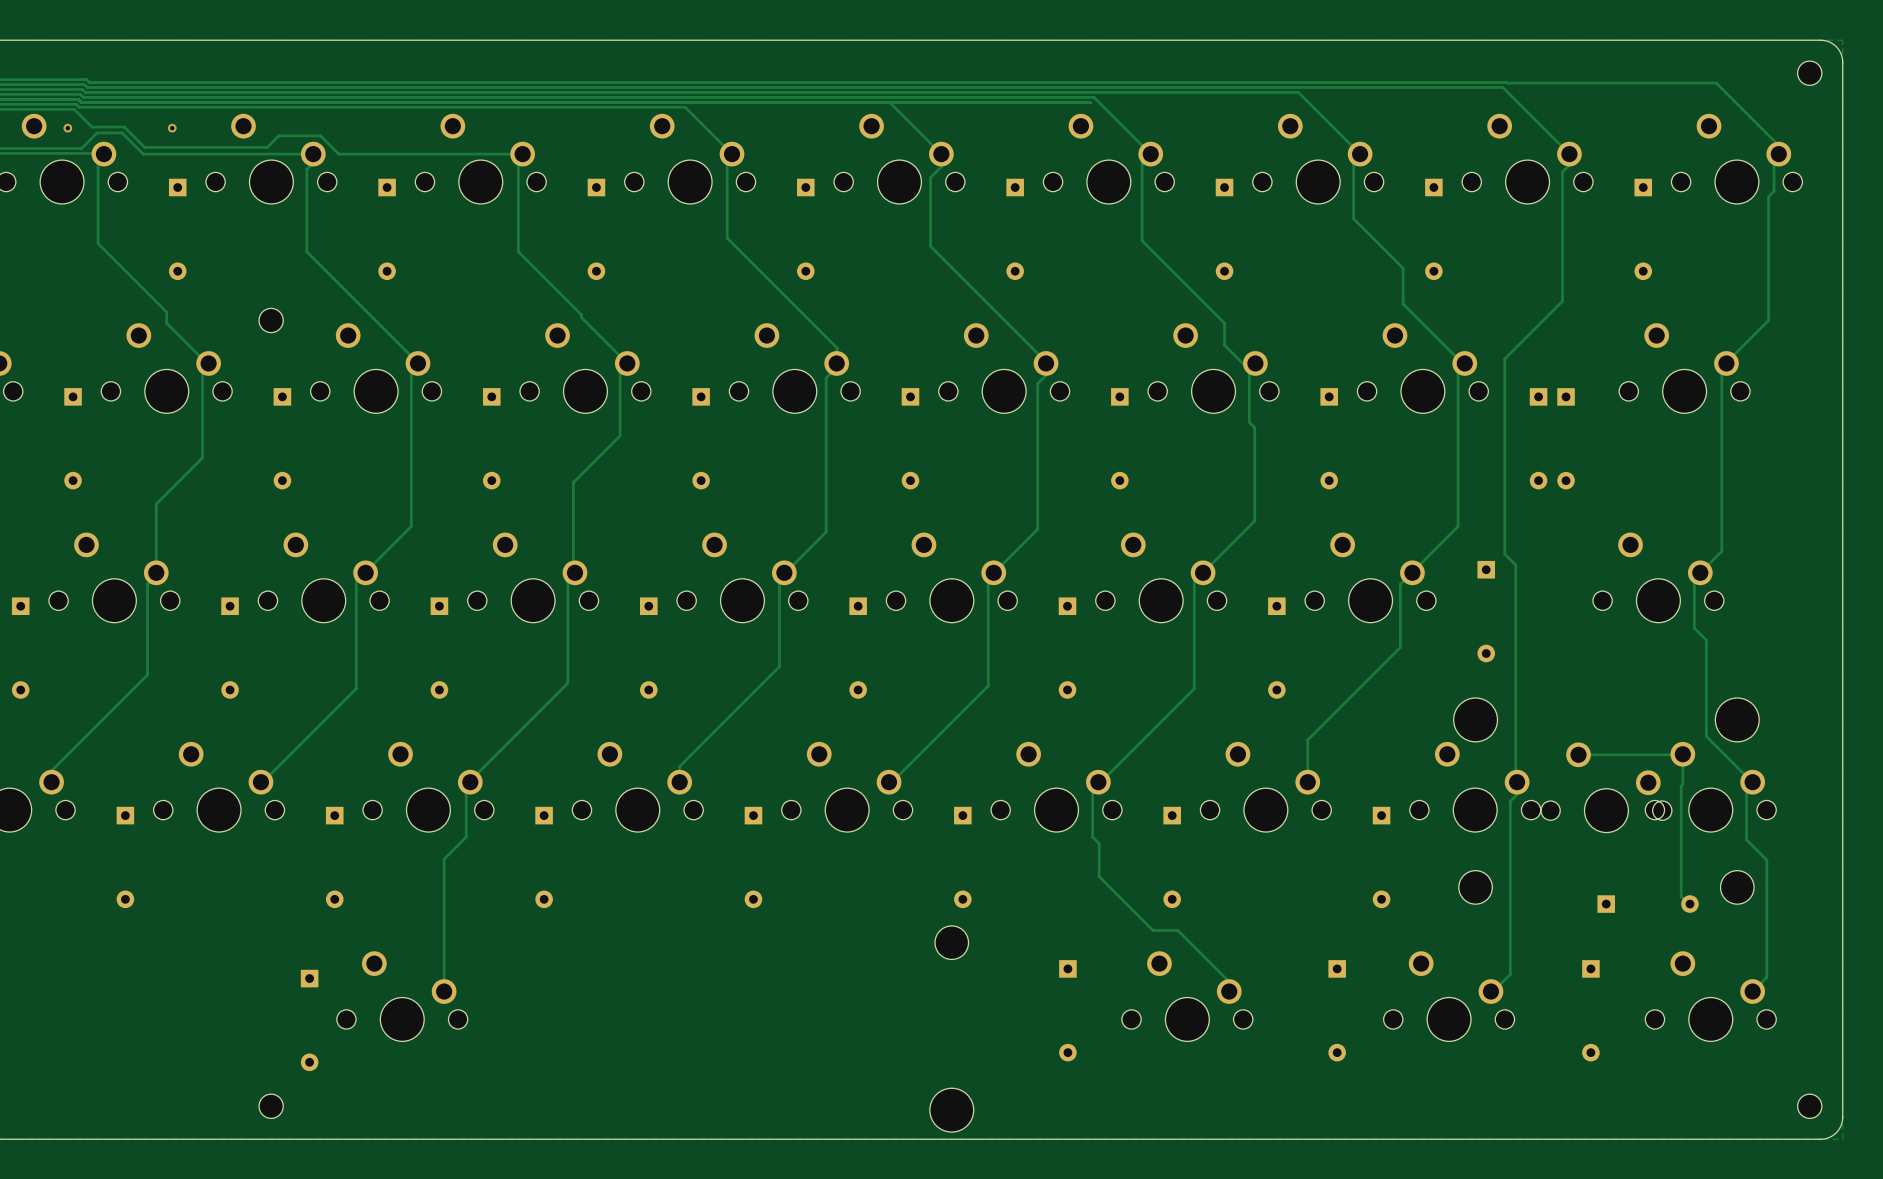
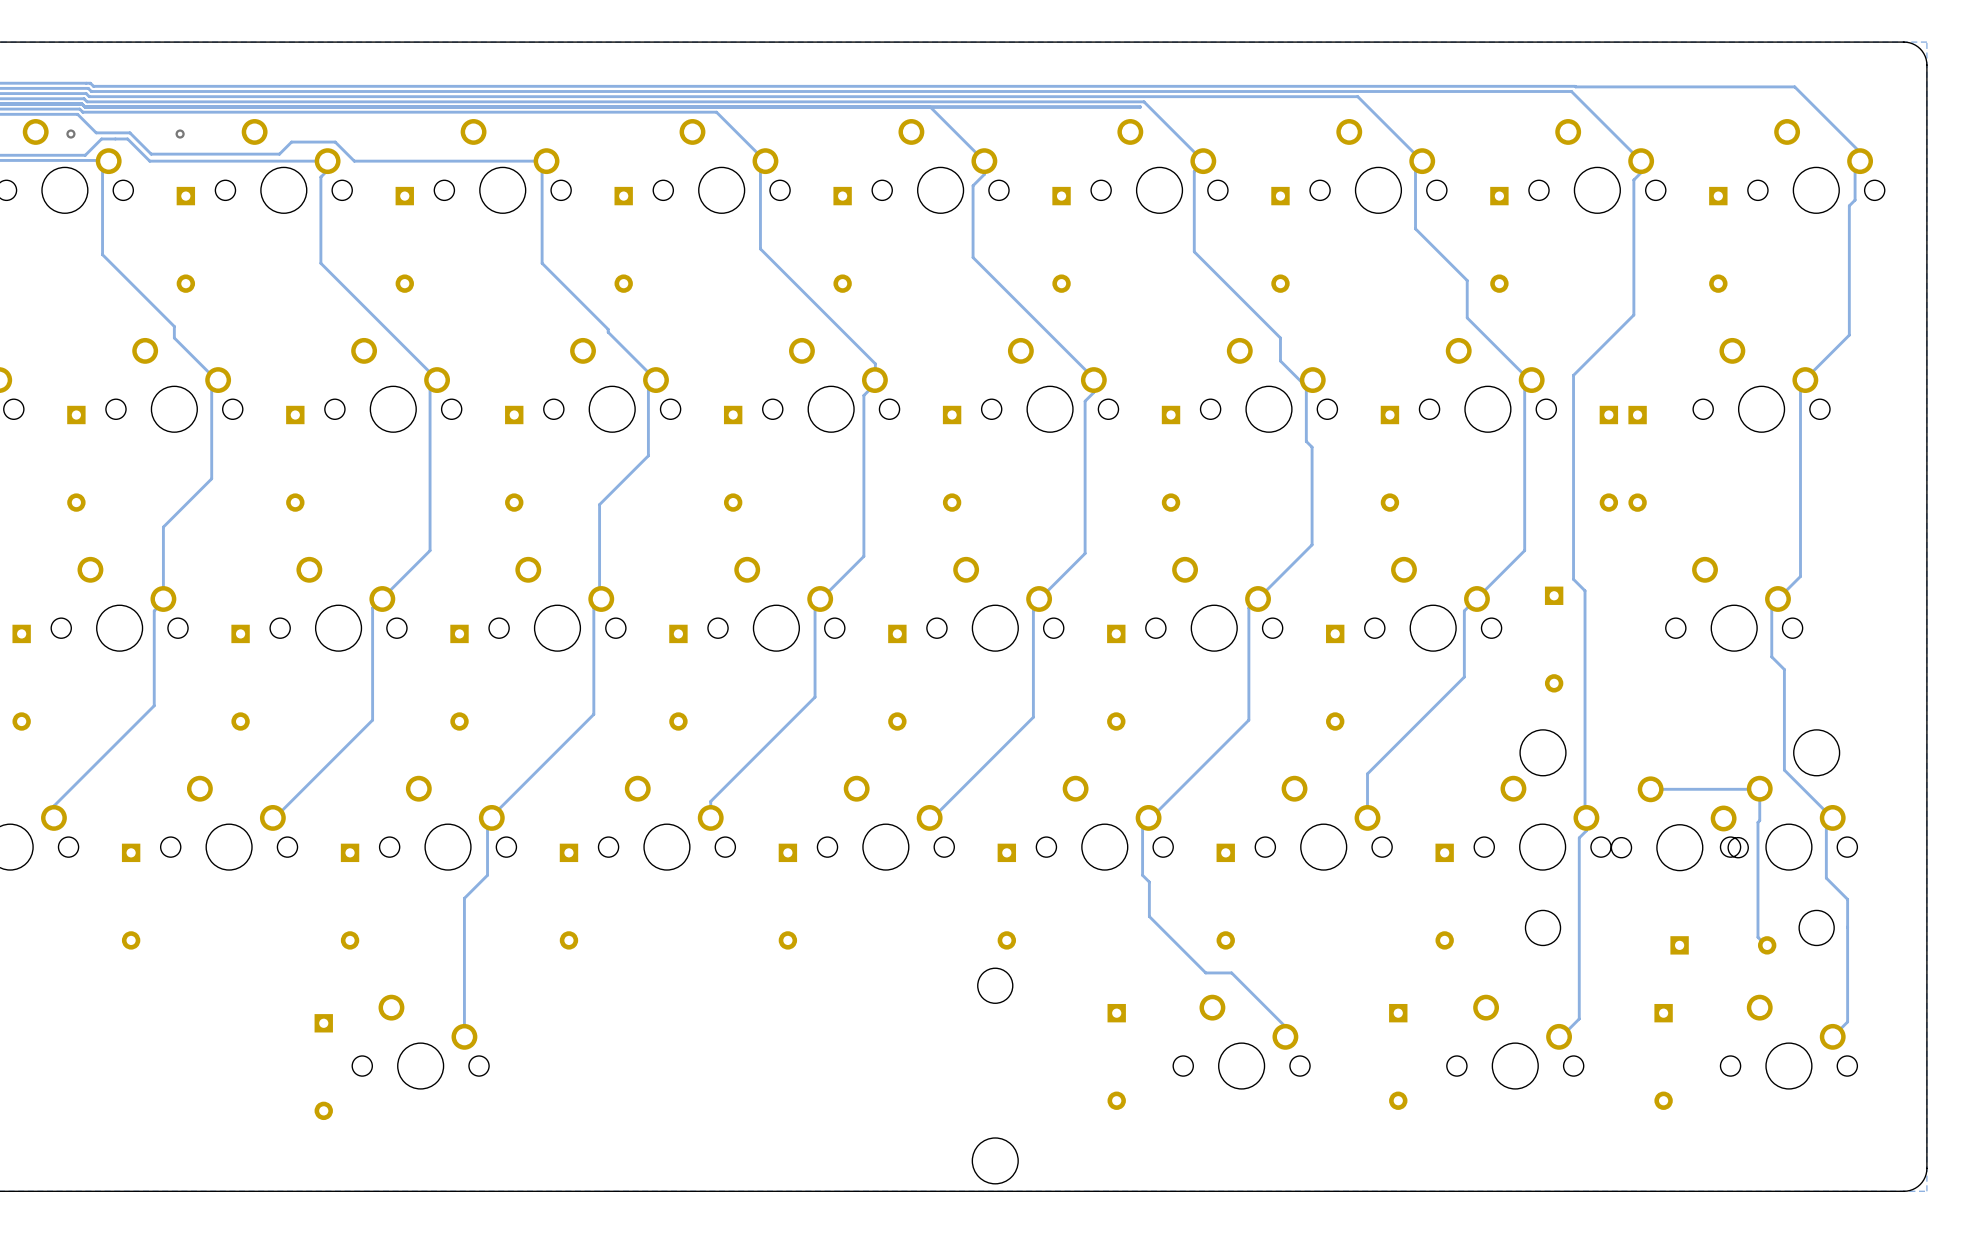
part: (1809, 73) -> none
part: (271, 320) -> none
part: (271, 1106) -> none
part: (1809, 1106) -> none

